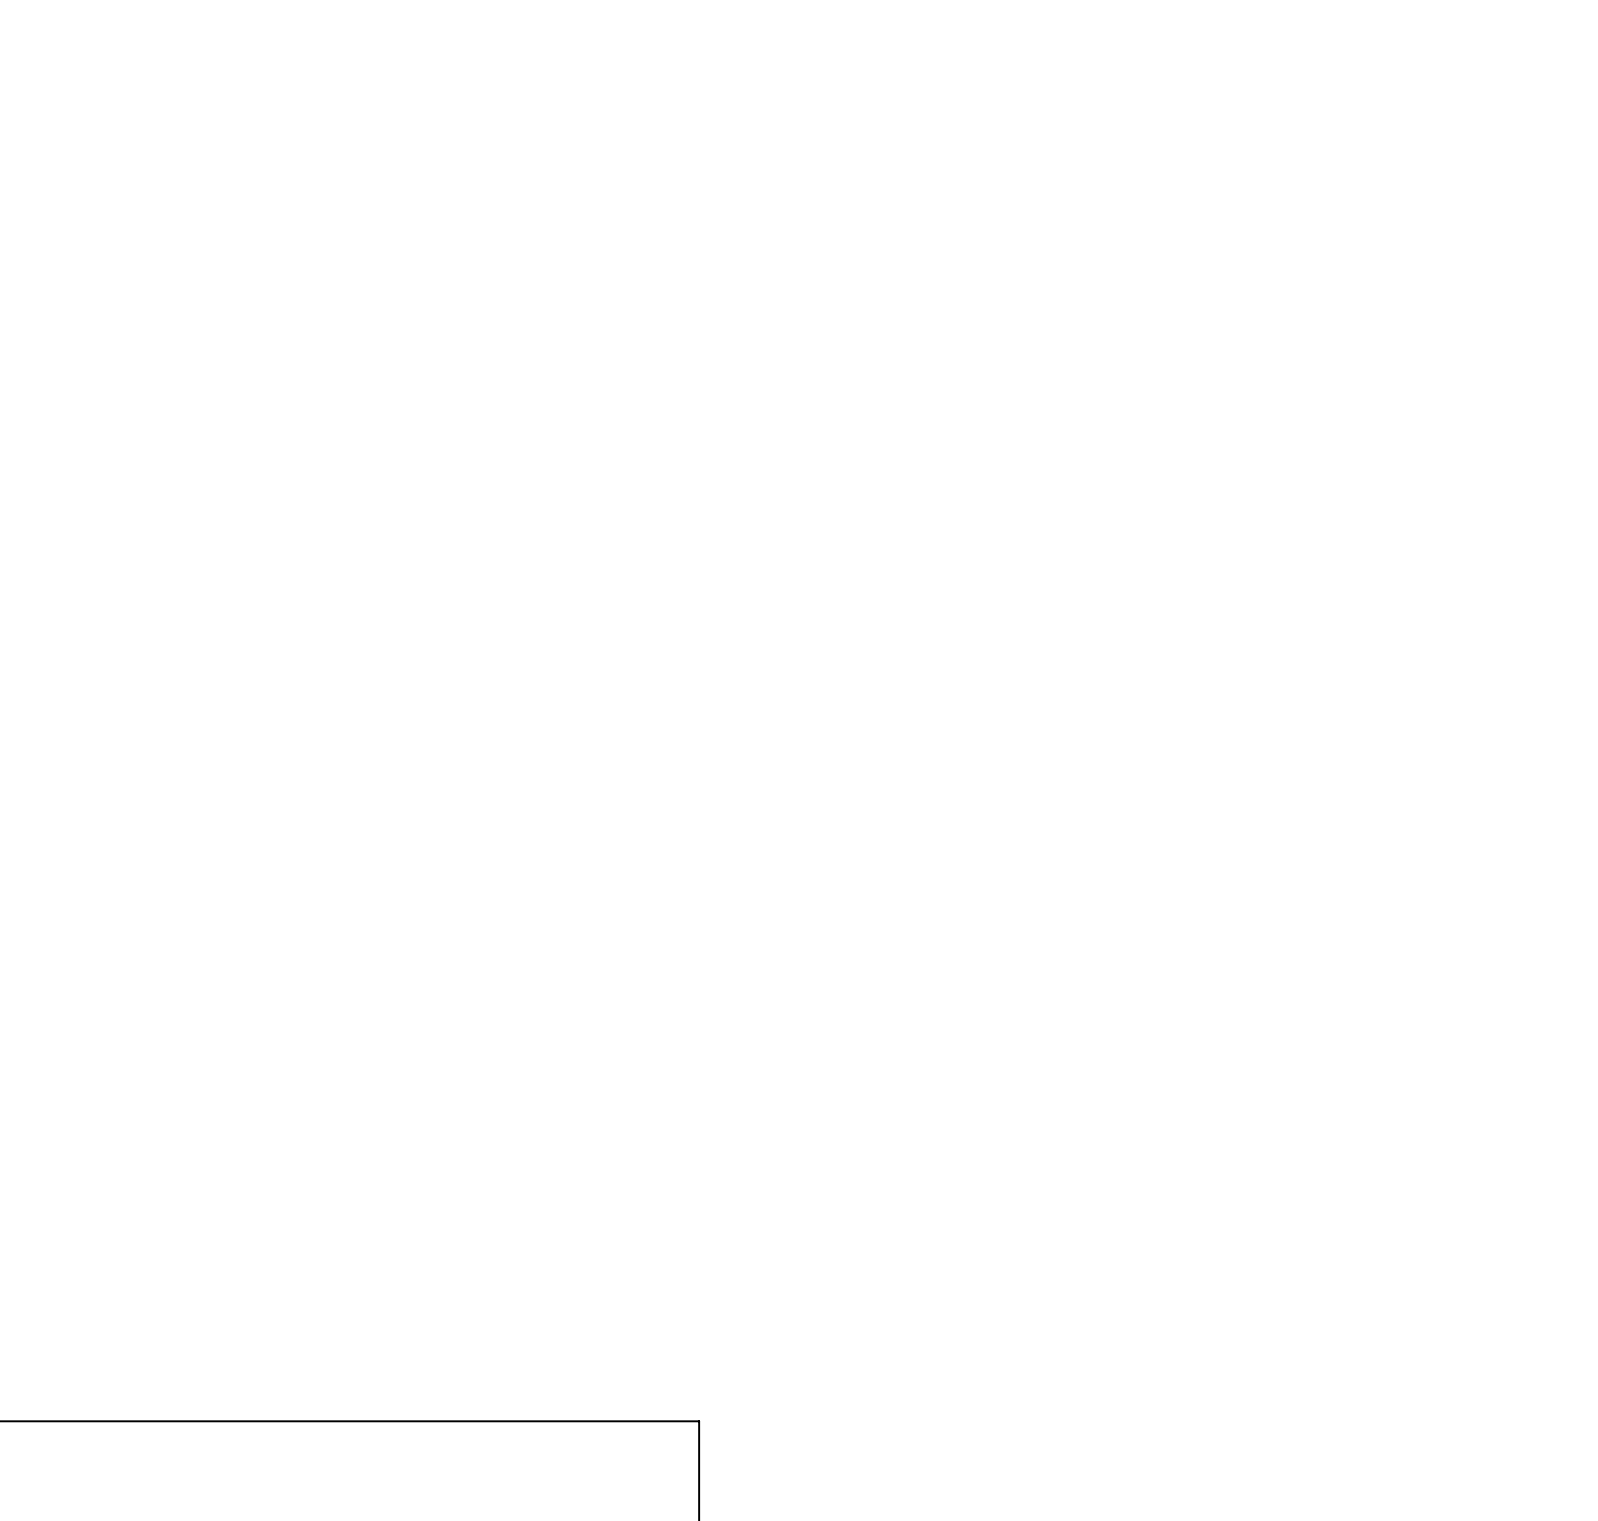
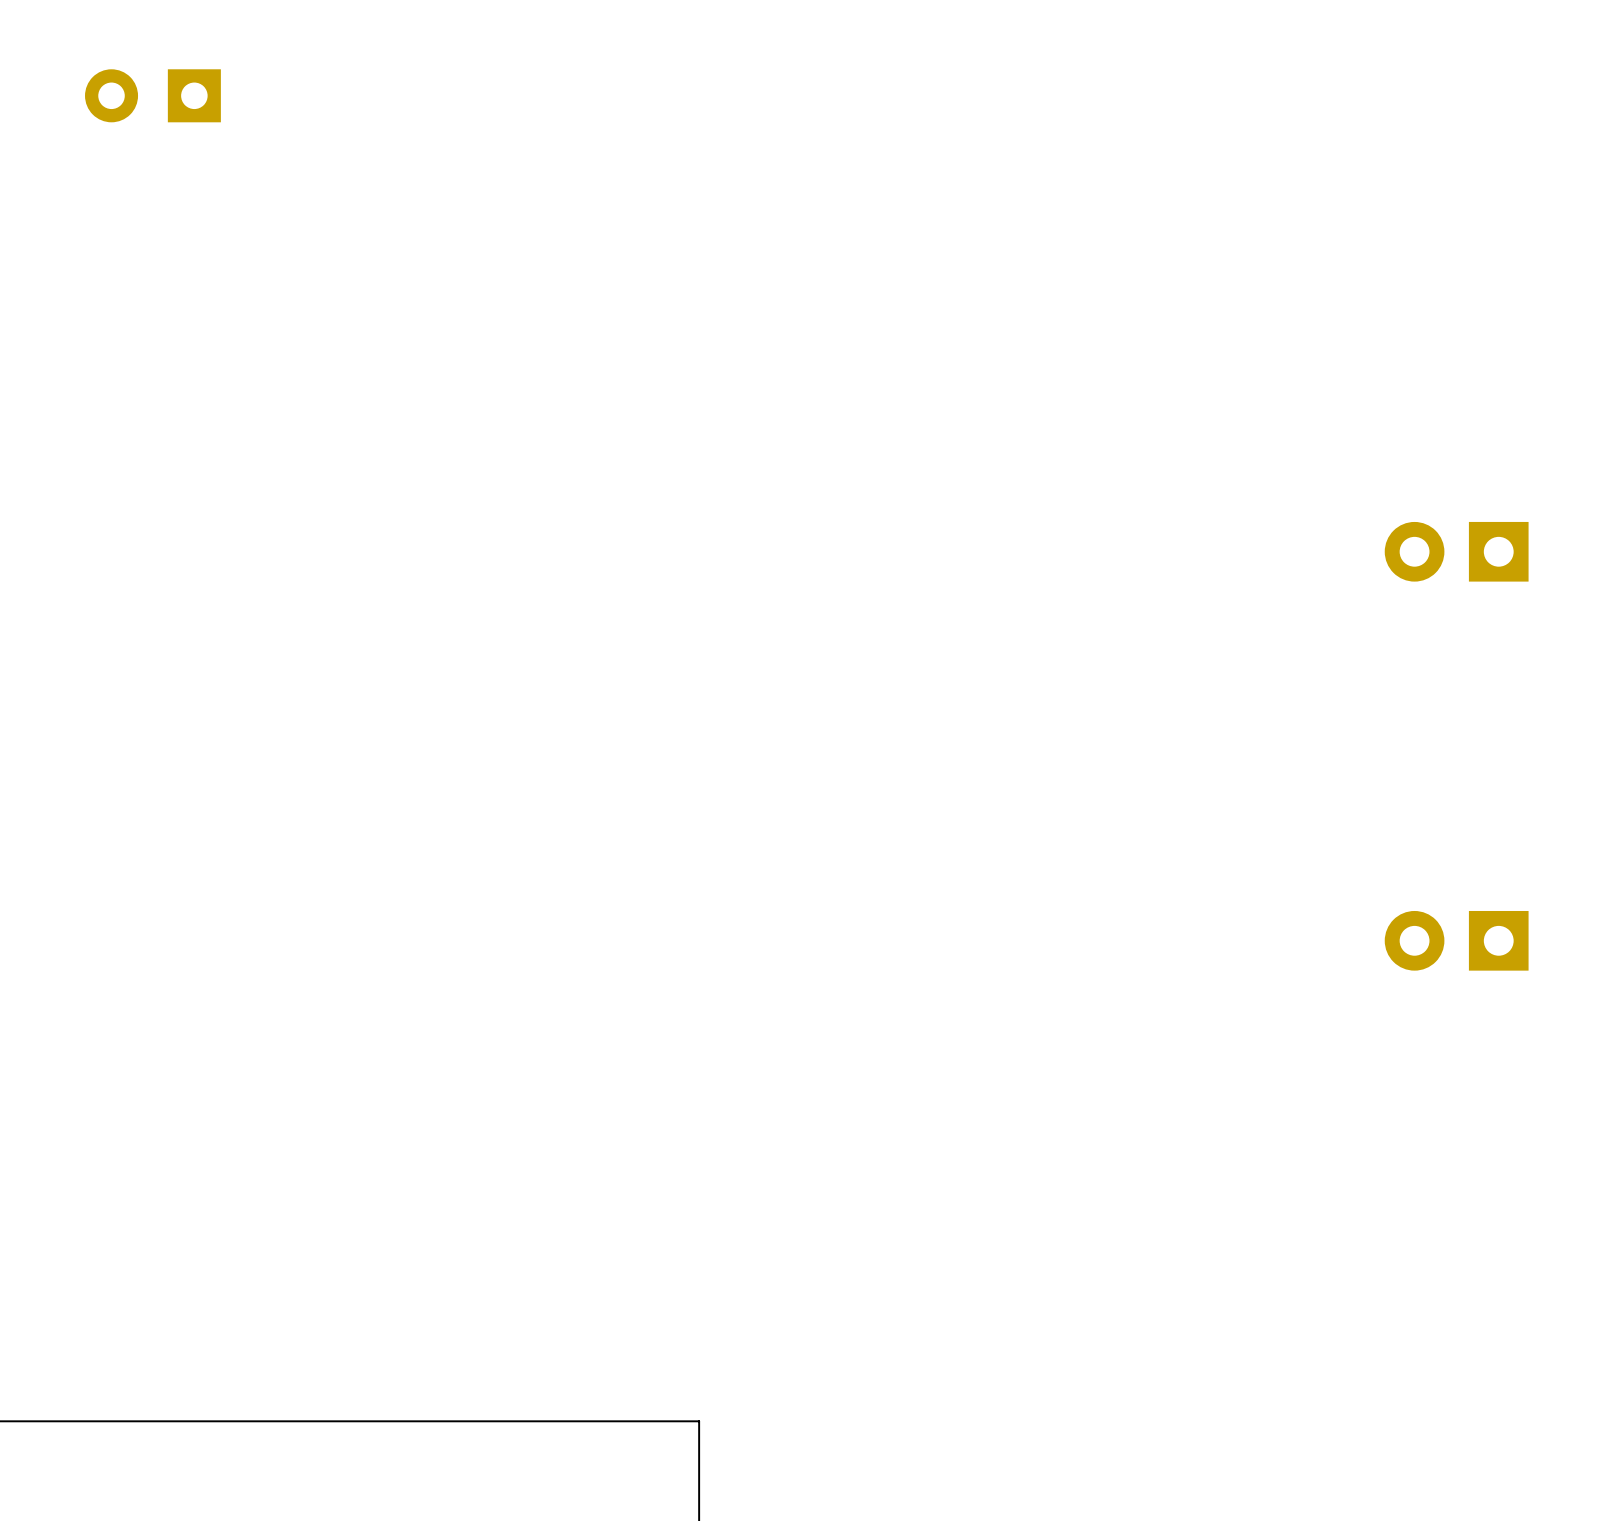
part: none -> (152, 95)
part: none -> (1456, 551)
part: none -> (1456, 940)

